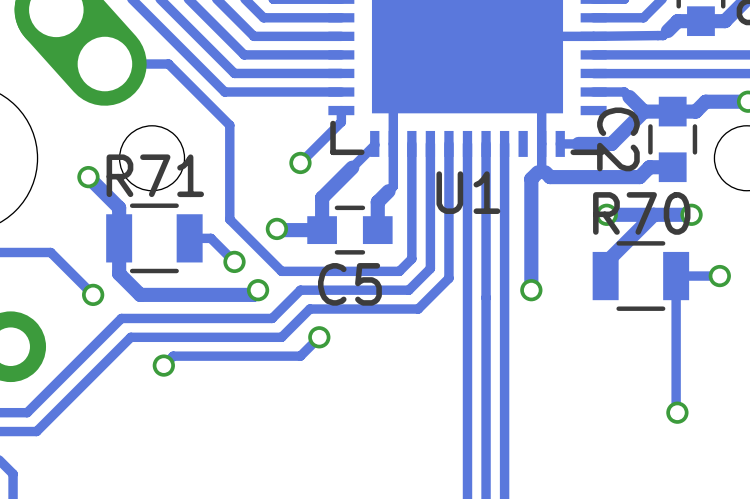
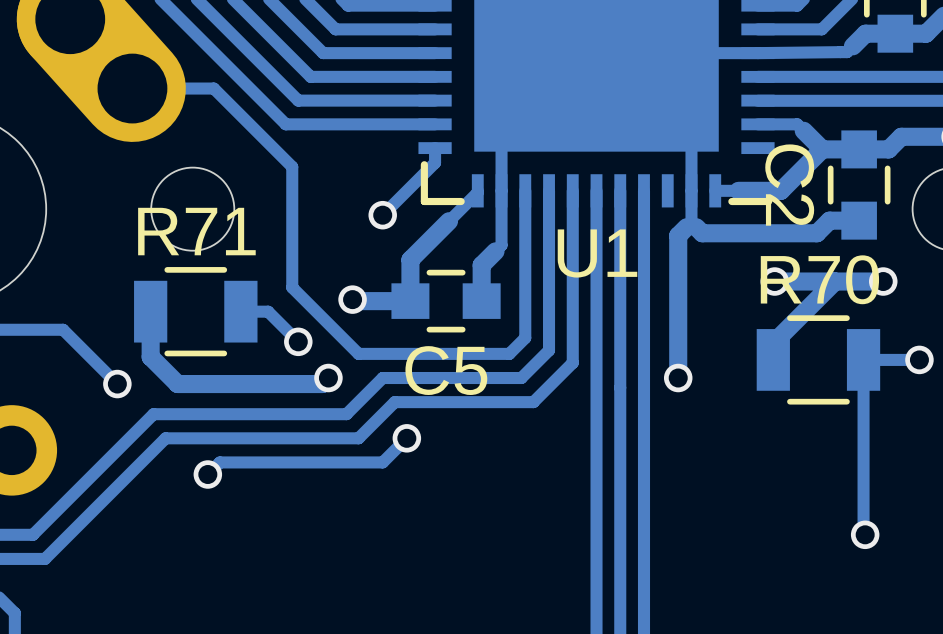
track: (88, 177) (119, 207) (119, 238) -> none
via: (88, 177) -> none

